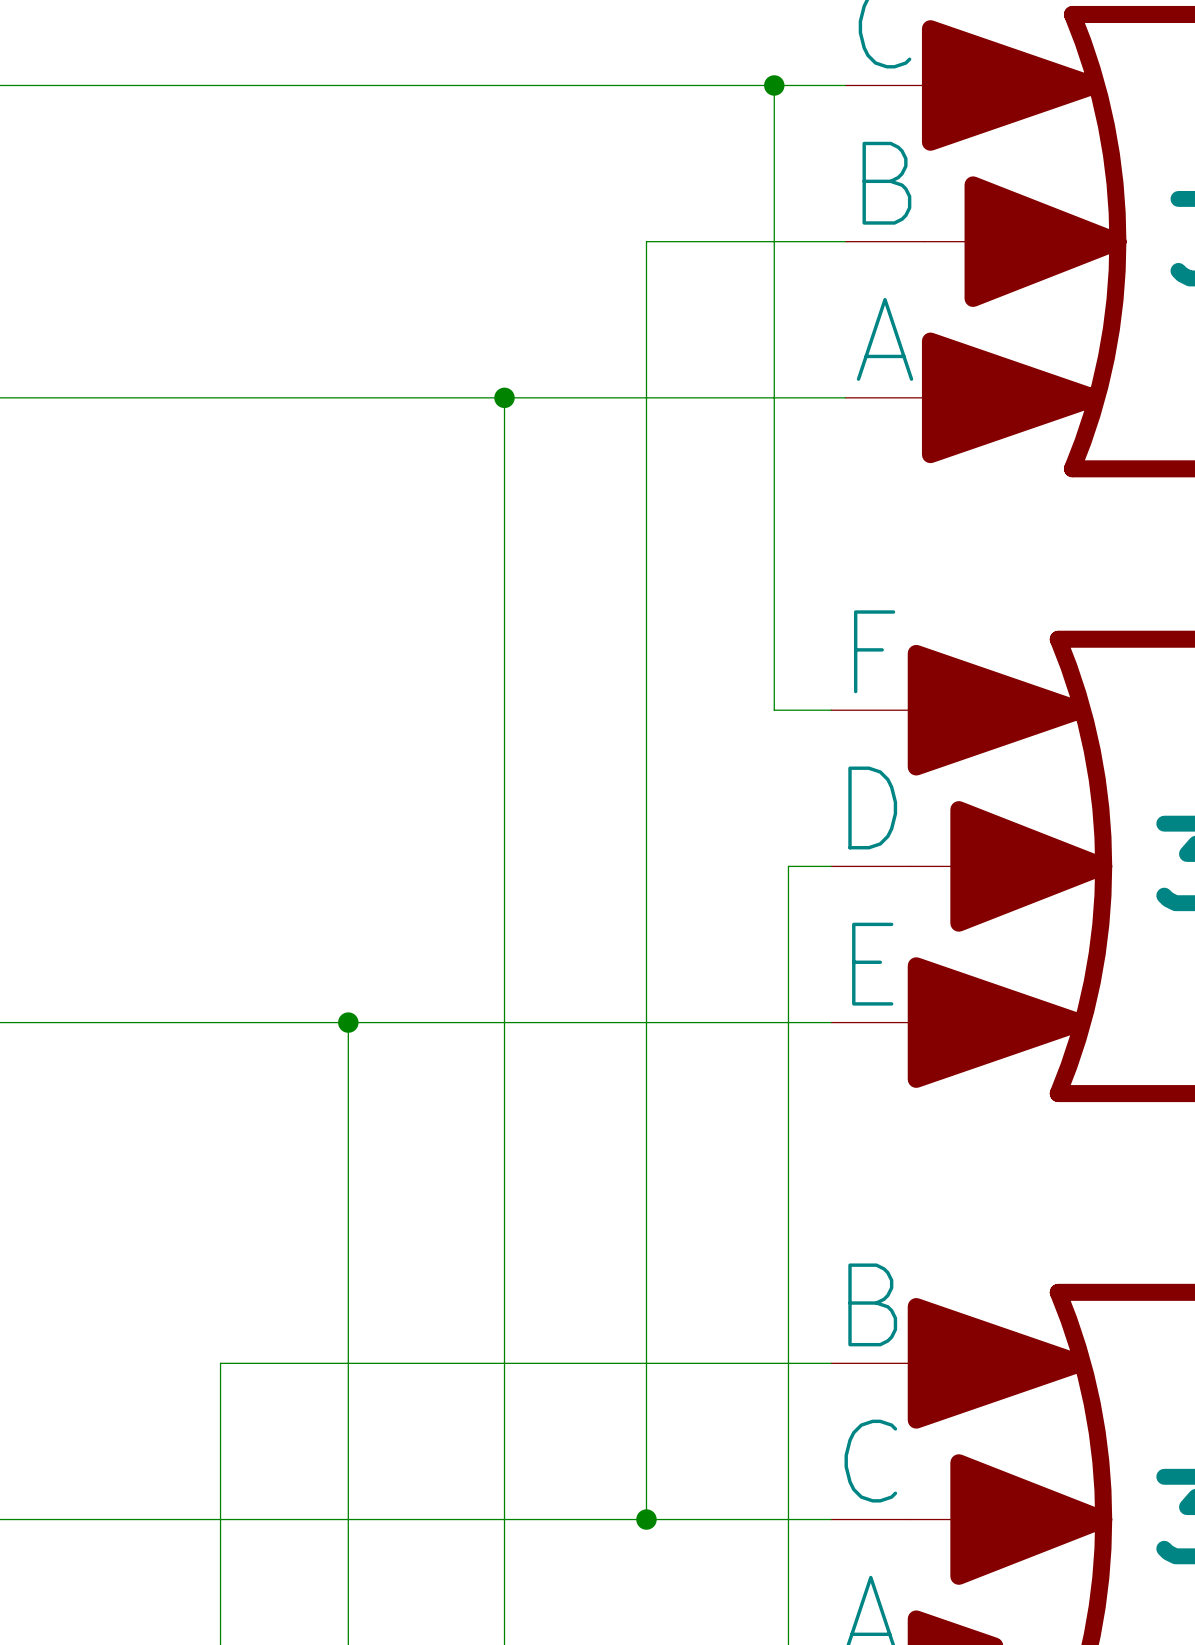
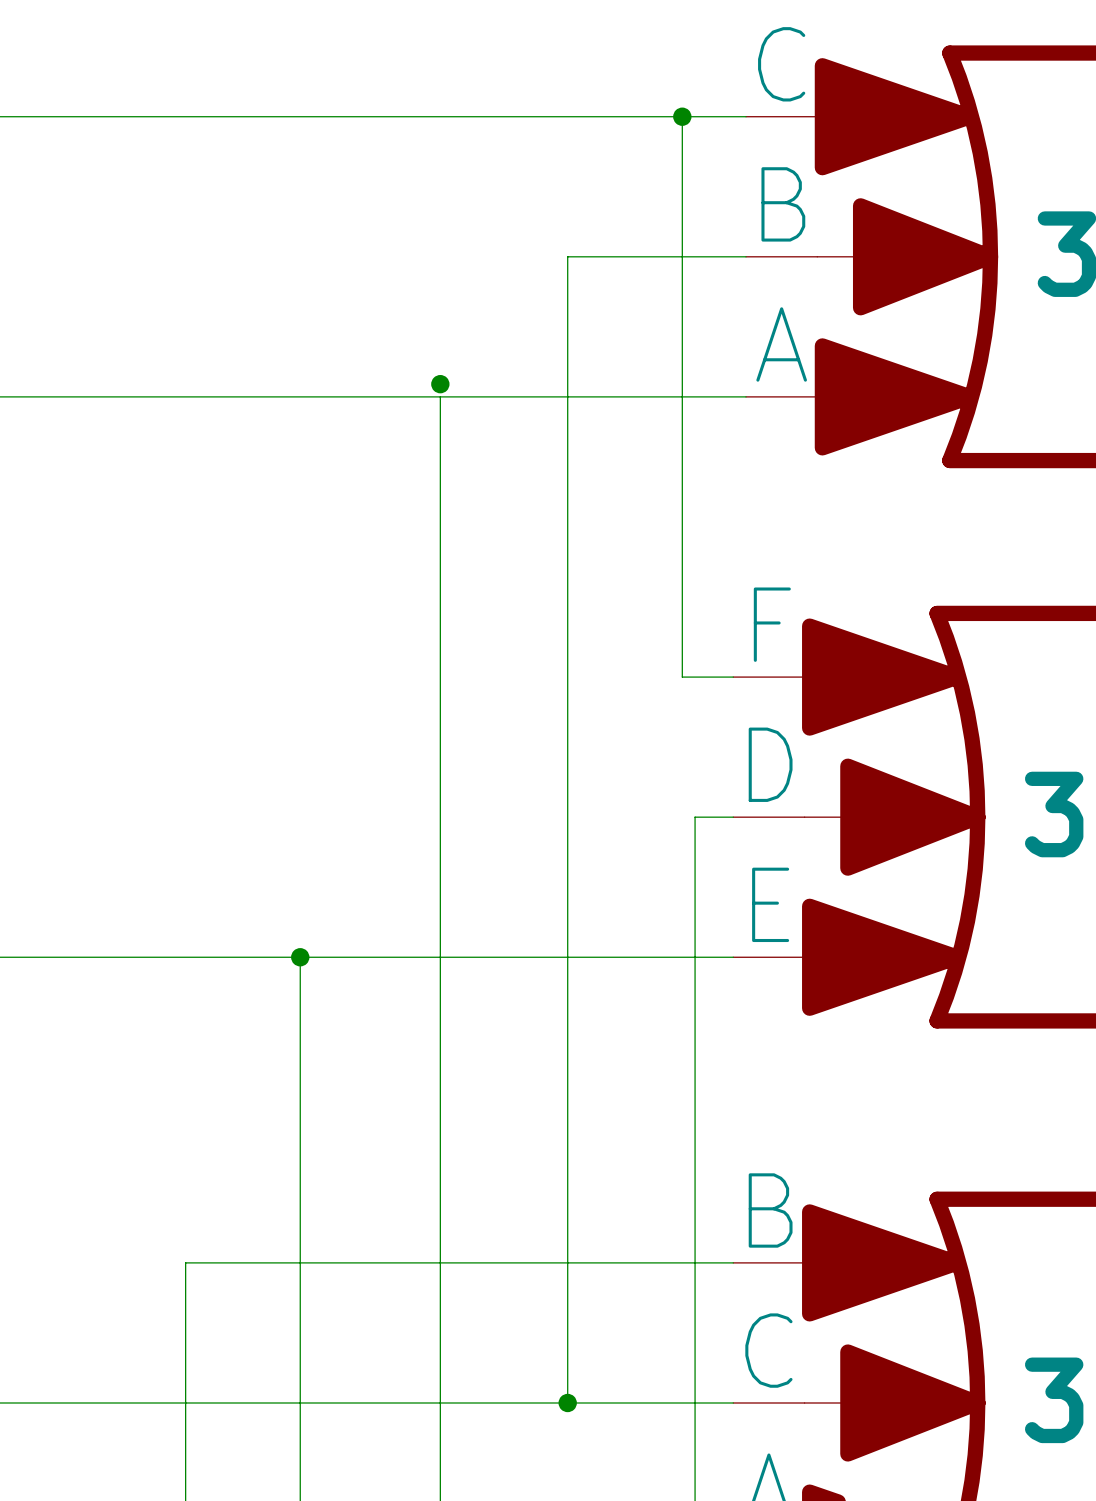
junction position: (504, 397) -> (440, 384)

